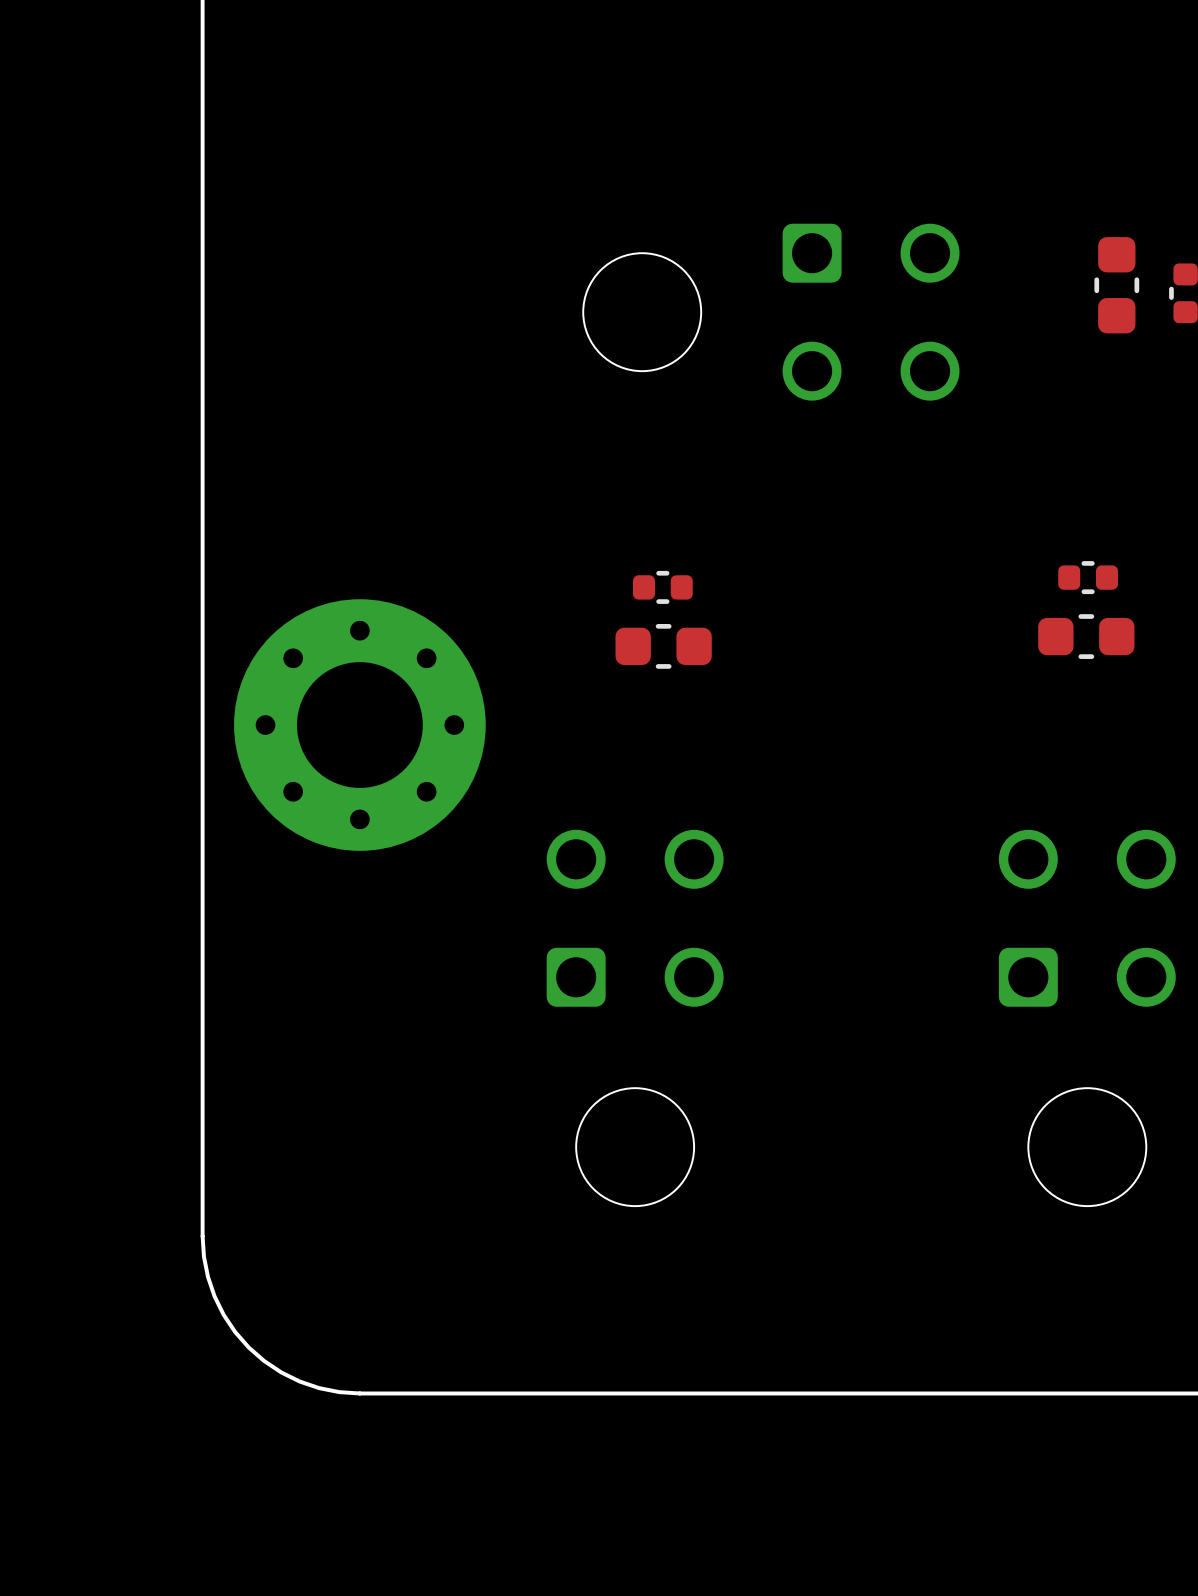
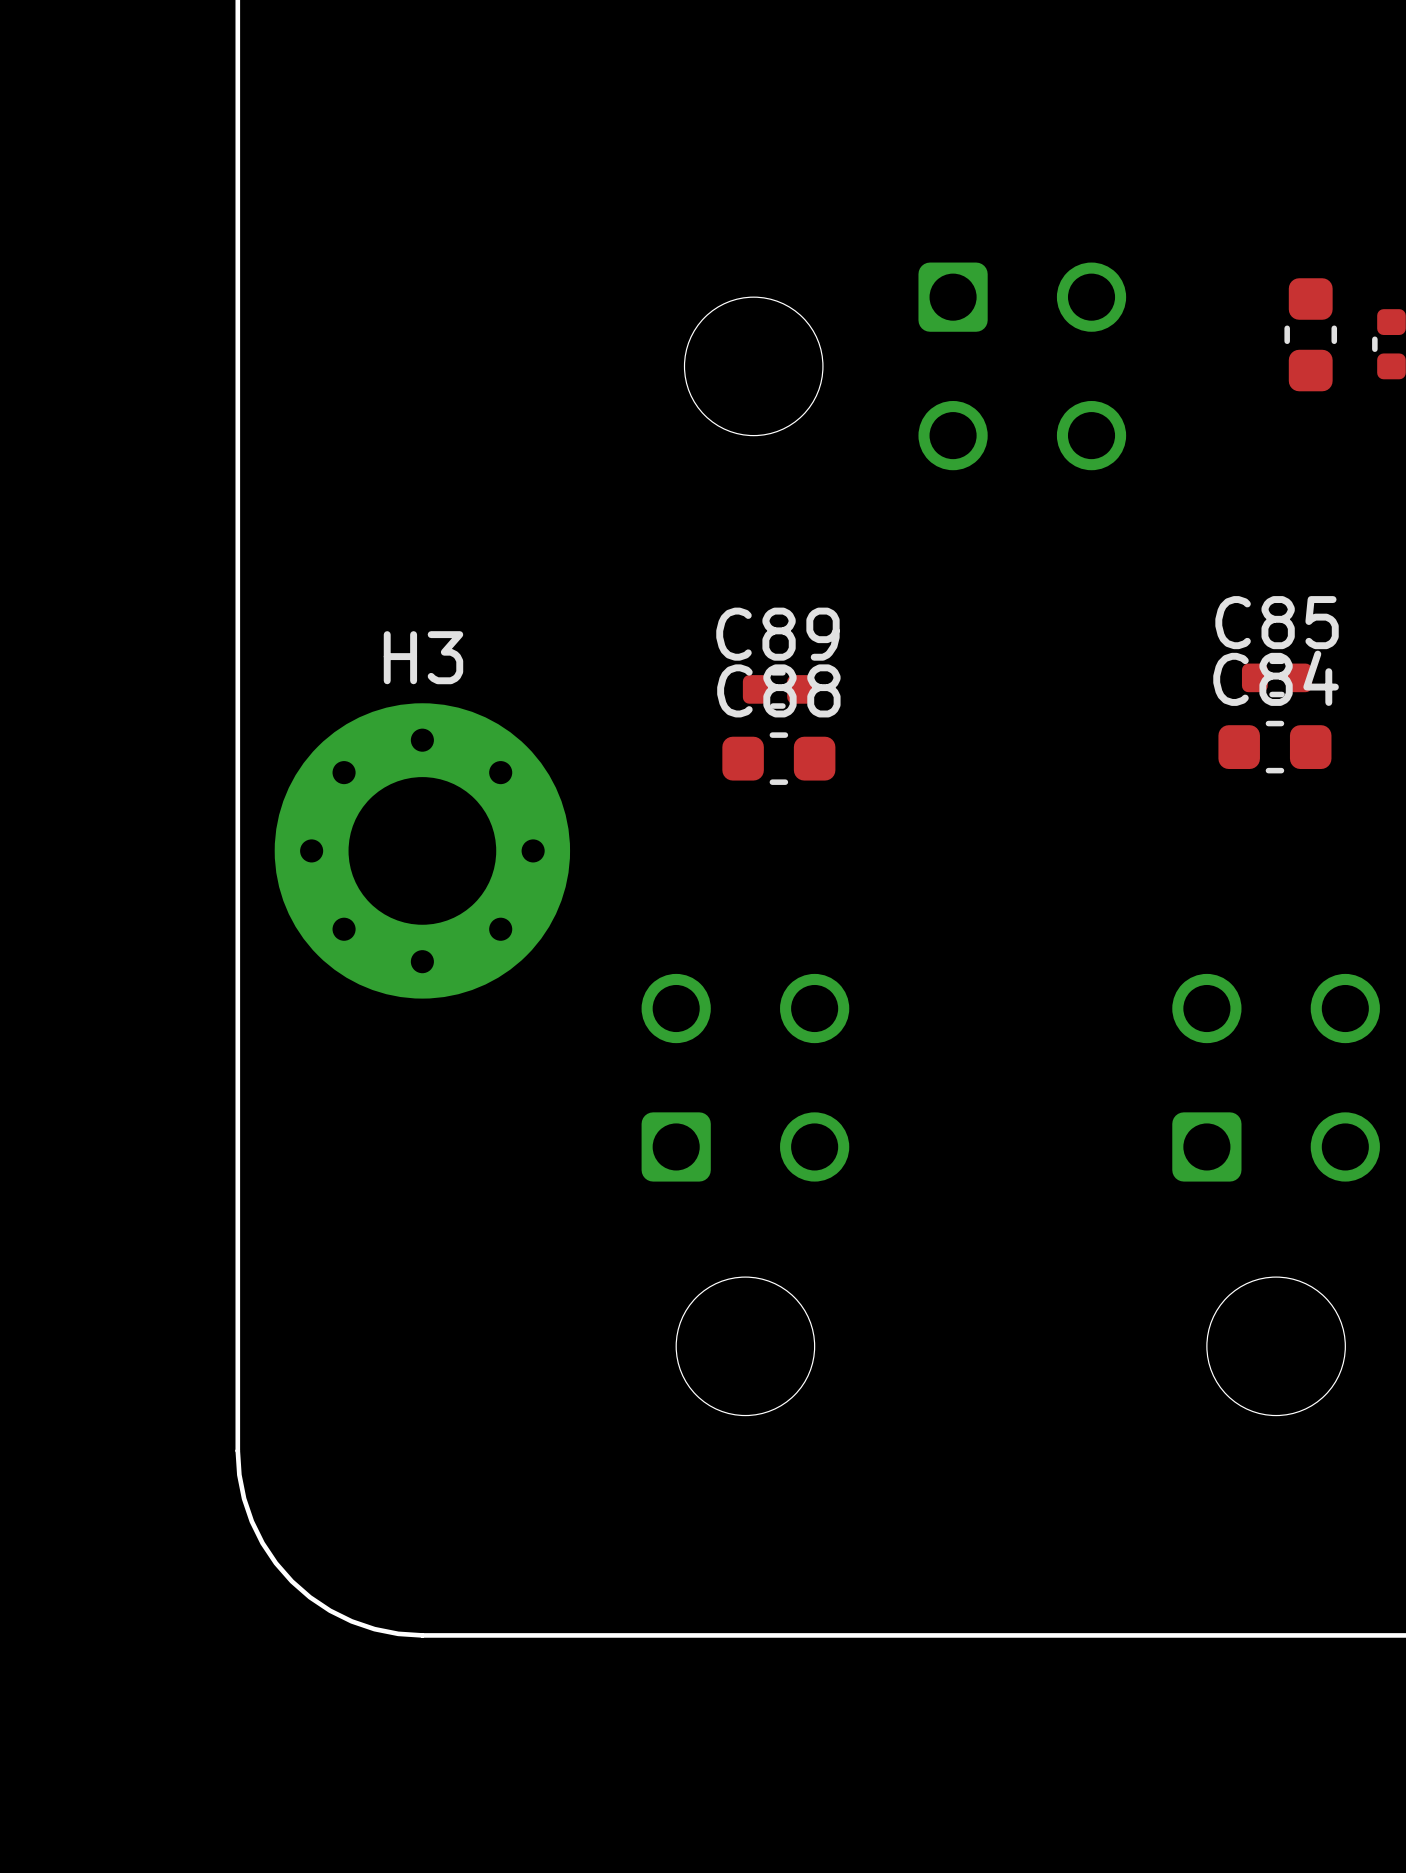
C85 name: none -> C85 (1277, 622)
C89 name: none -> C89 (777, 634)
H3 name: none -> H3 (423, 657)
C84 name: none -> C84 (1276, 678)
C88 name: none -> C88 (778, 690)

